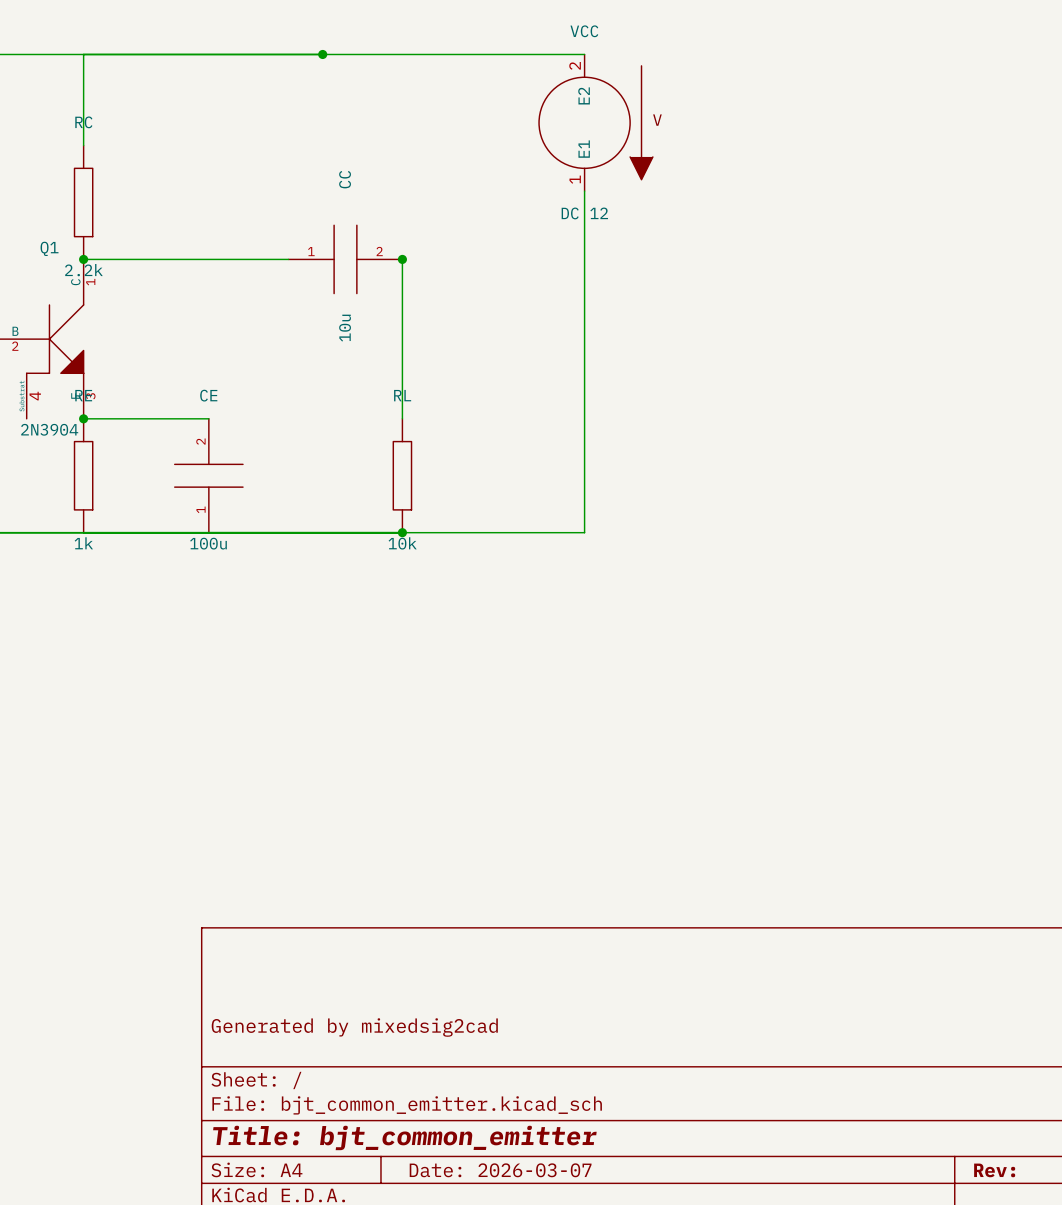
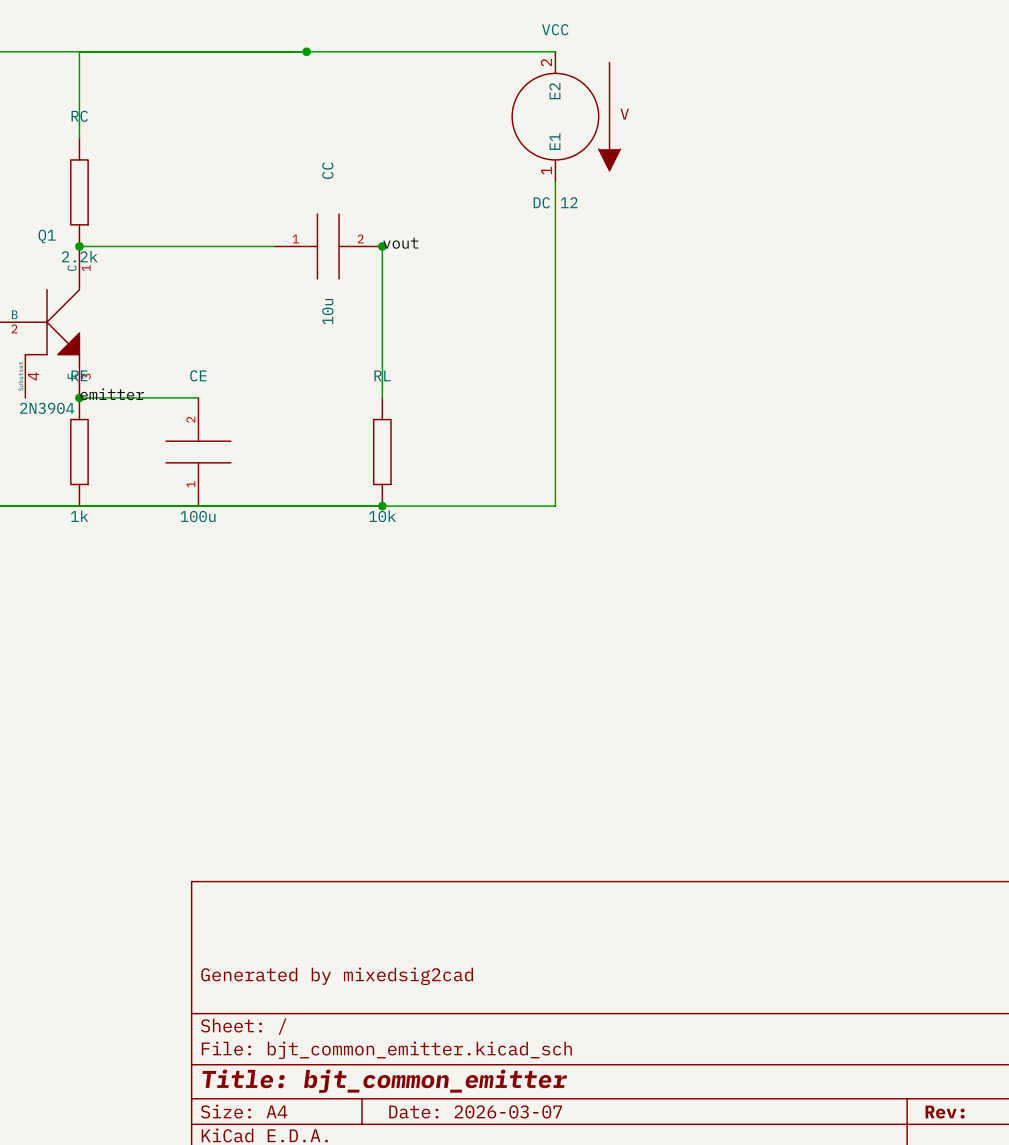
label: none -> vout (400, 243)
label: none -> emitter (112, 394)

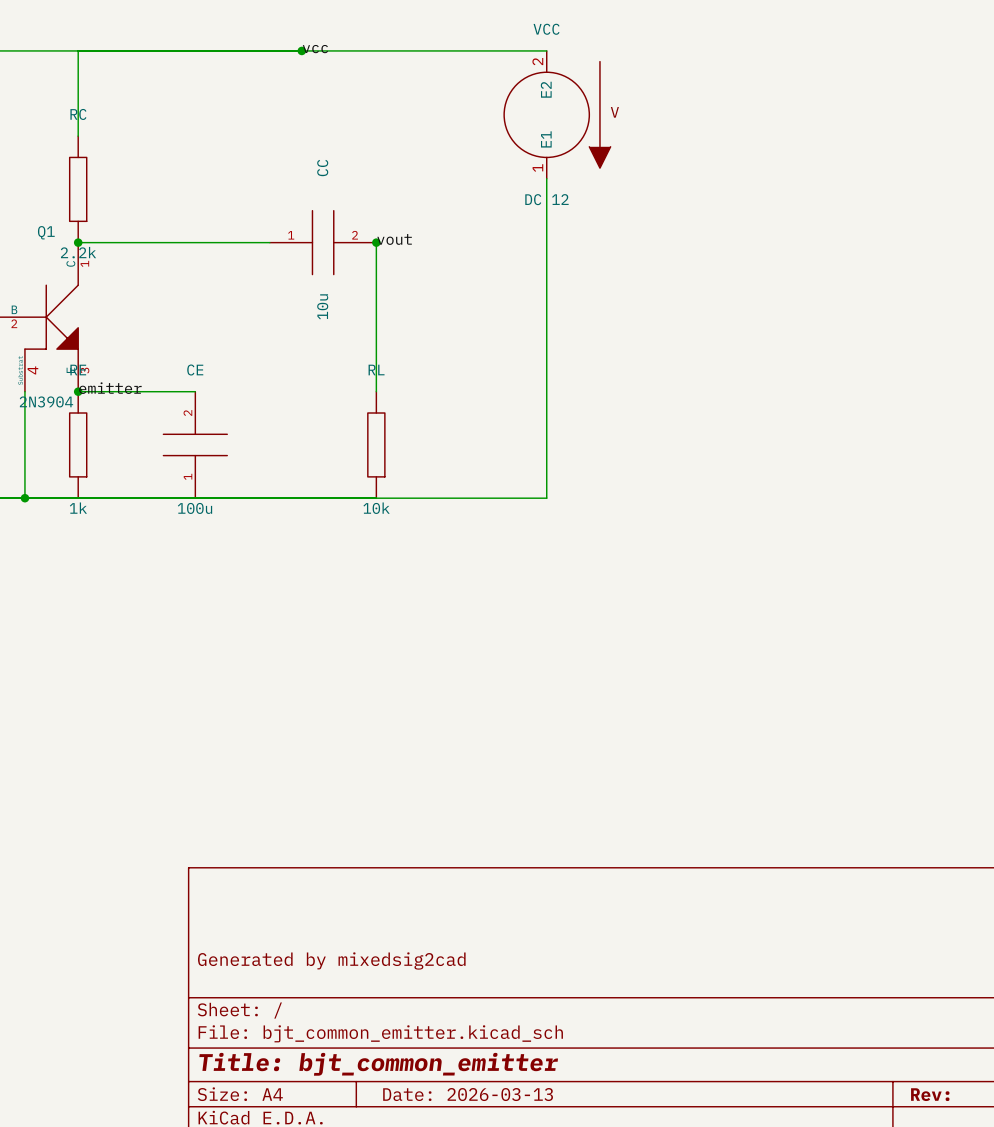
label: none -> vcc (315, 49)
wire: none -> (24, 391) (24, 498)
junction: none -> (24, 498)
junction: (382, 506) -> none
title block: Date: 2026-03-07 (475, 1111) -> Date: 2026-03-13 (468, 1094)

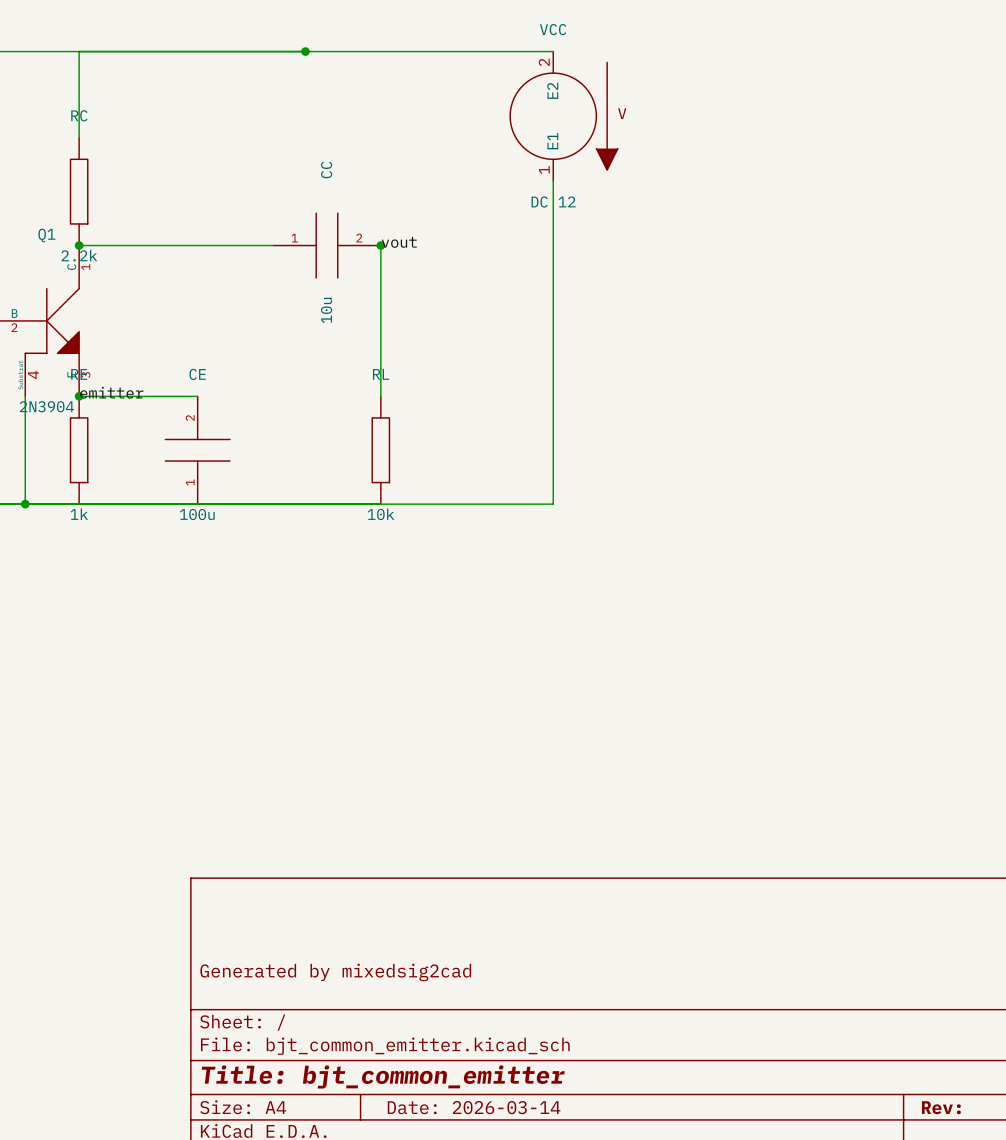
label: vcc (315, 49) -> none
title block: Date: 2026-03-13 (468, 1094) -> Date: 2026-03-14 (474, 1107)

